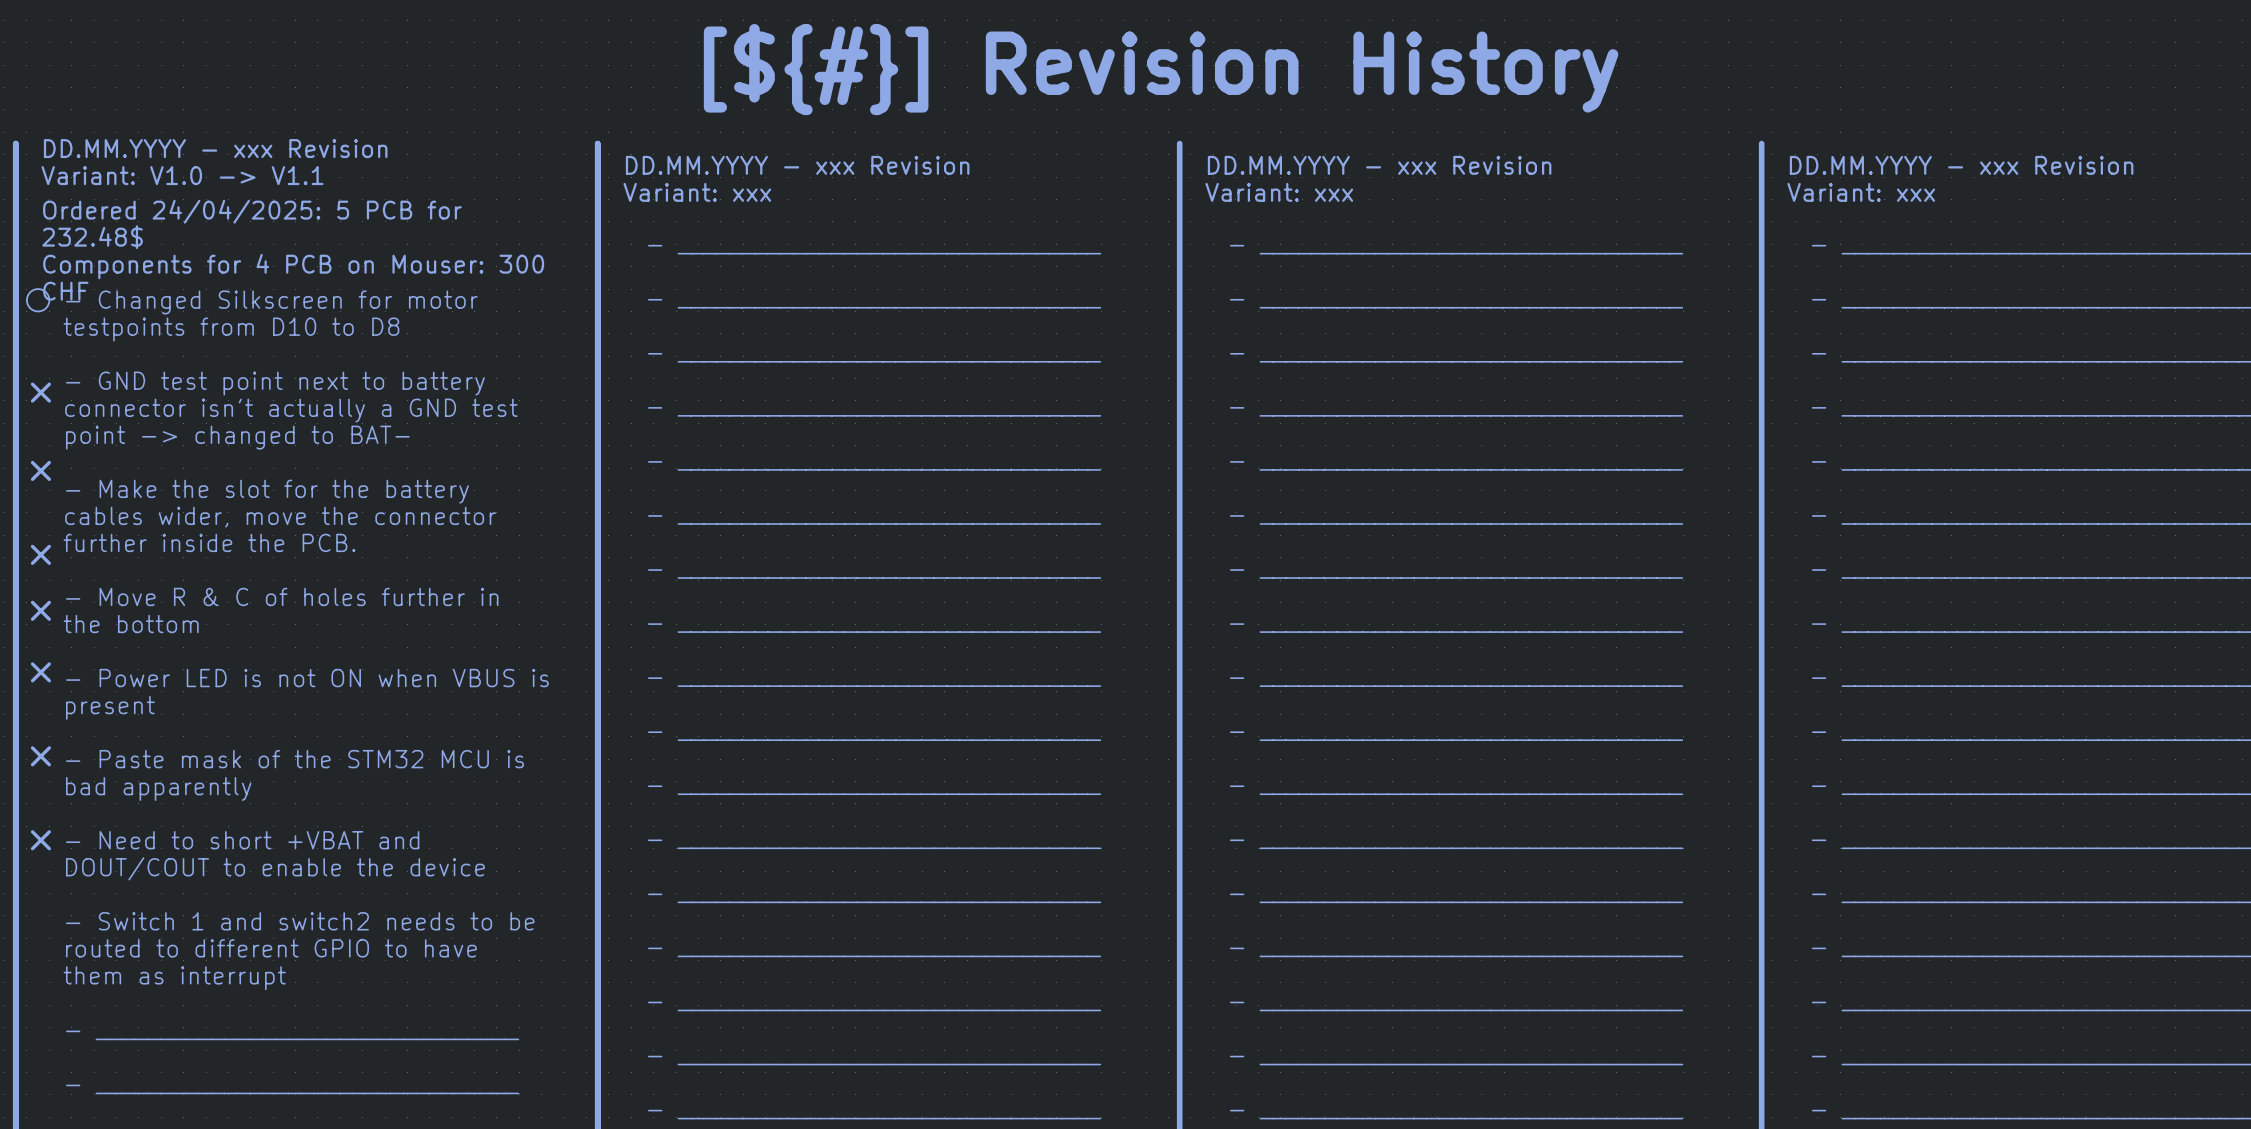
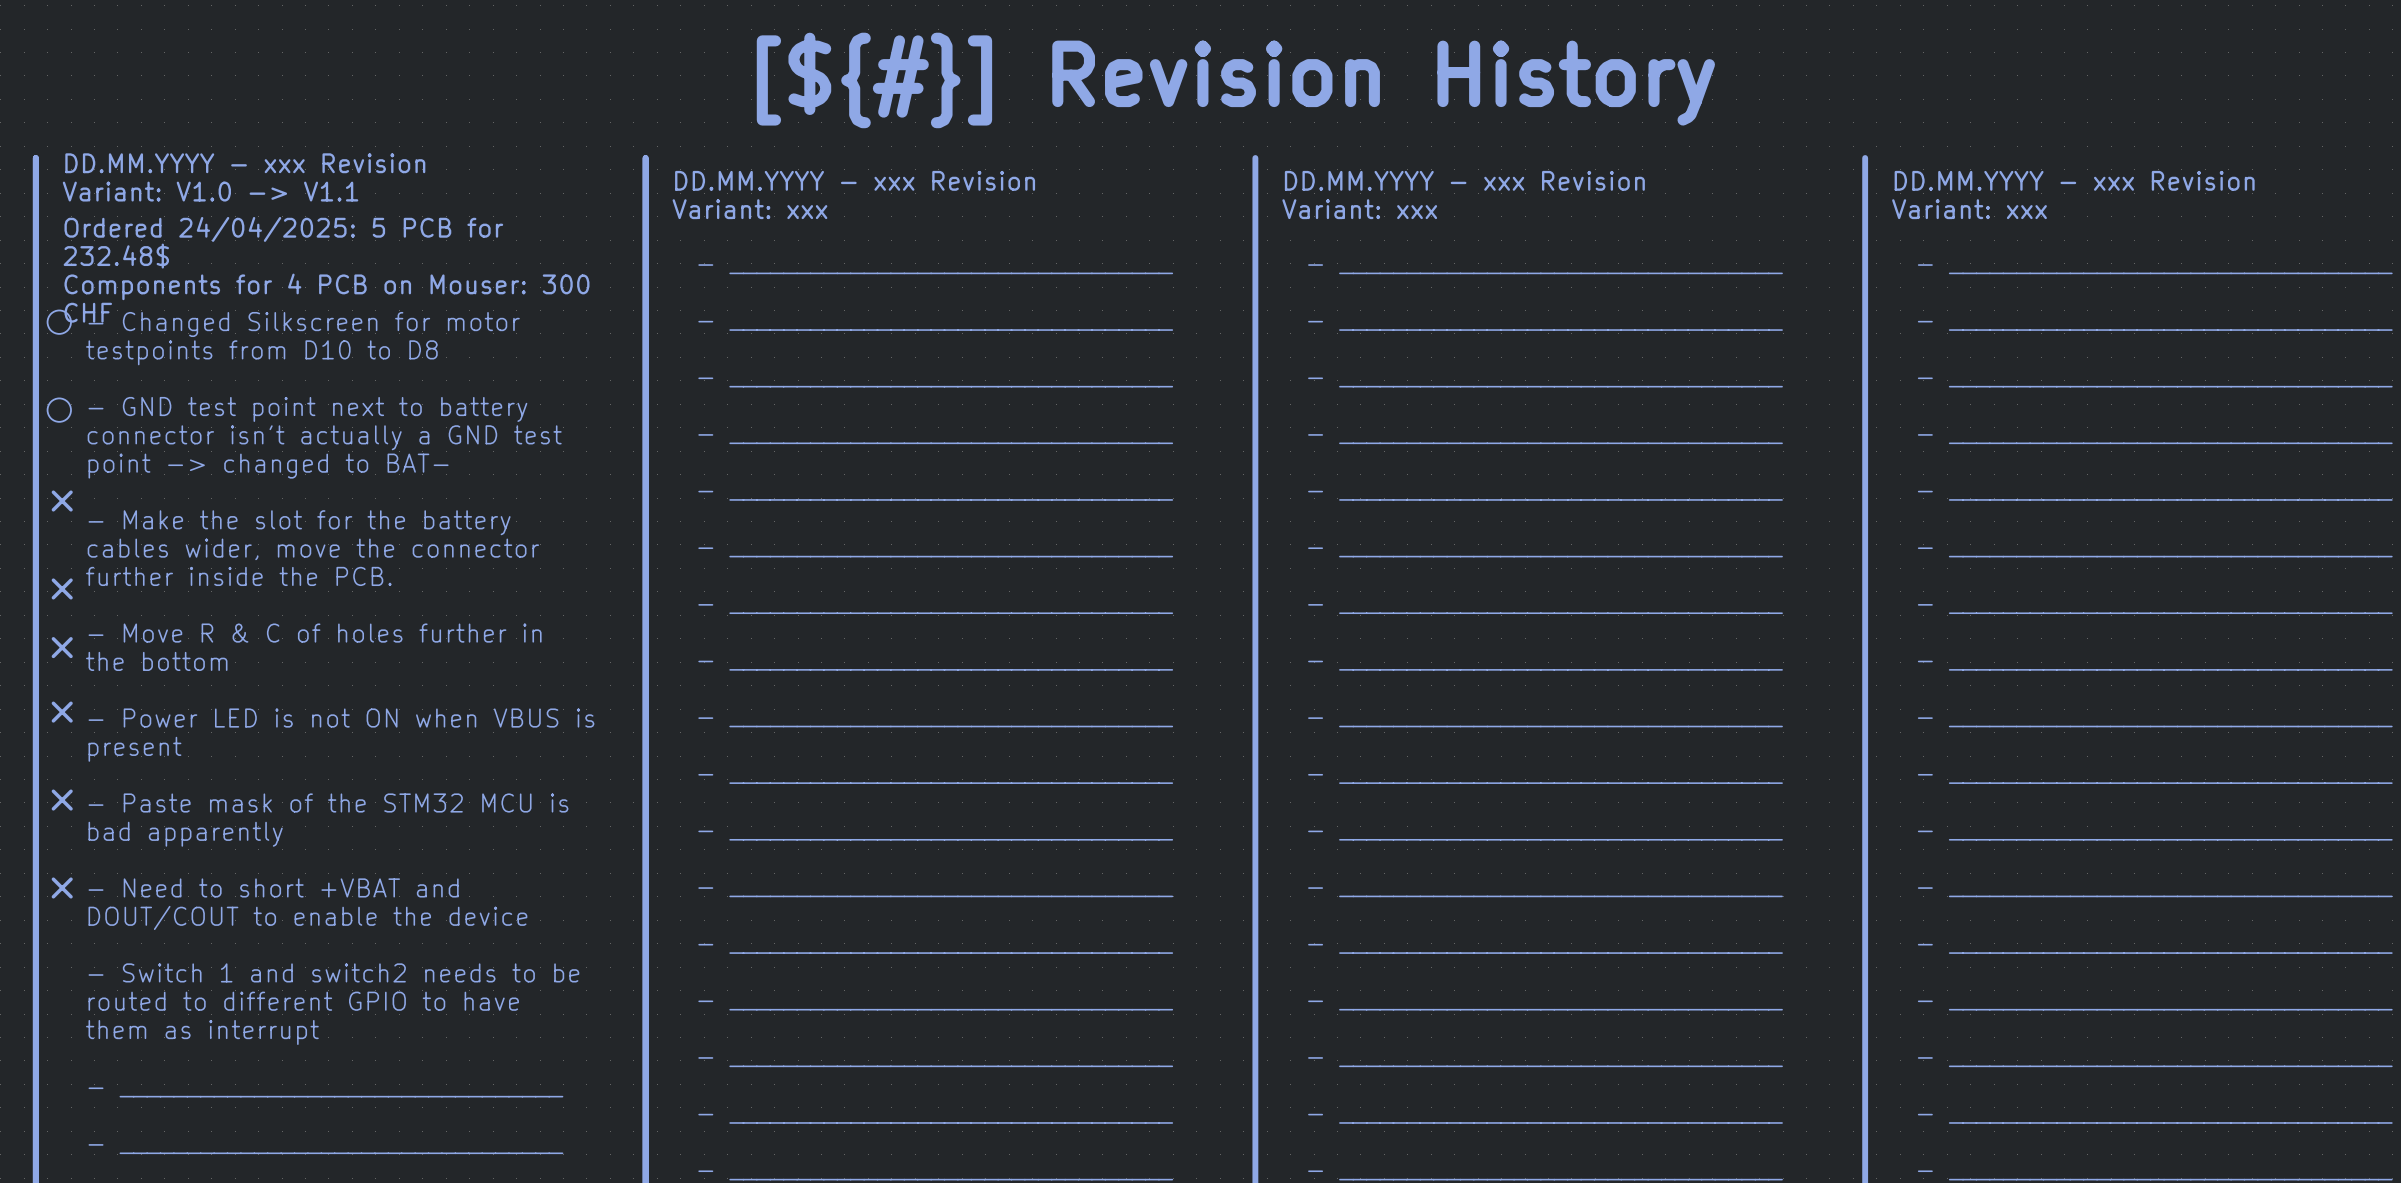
drawing: none -> [47, 398, 72, 422]
line: (32, 384) (49, 400) -> none
line: (49, 384) (32, 400) -> none

